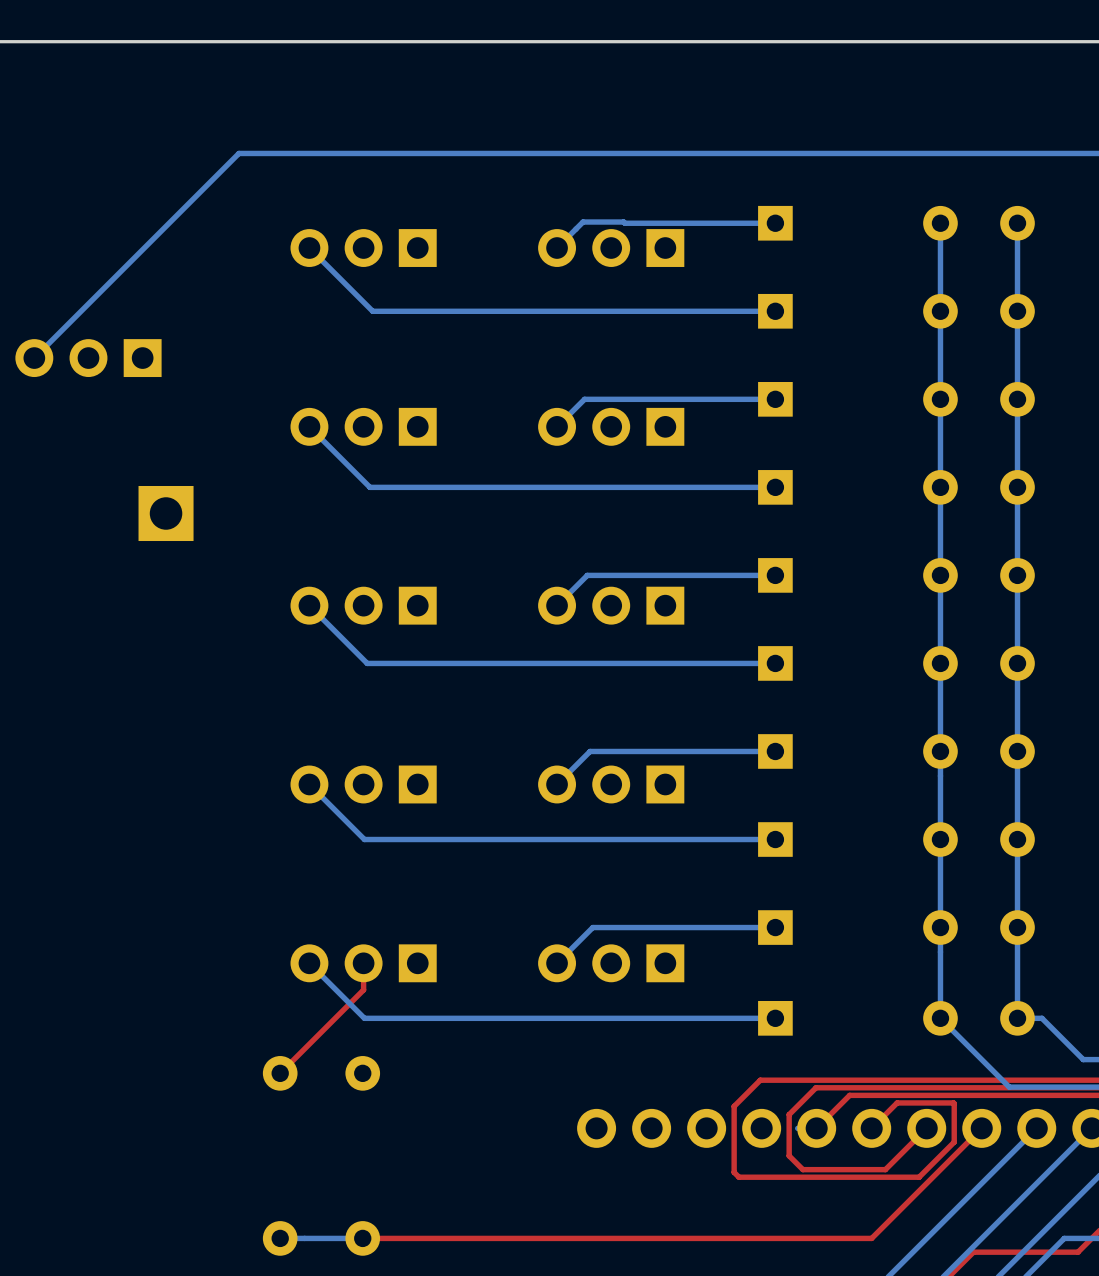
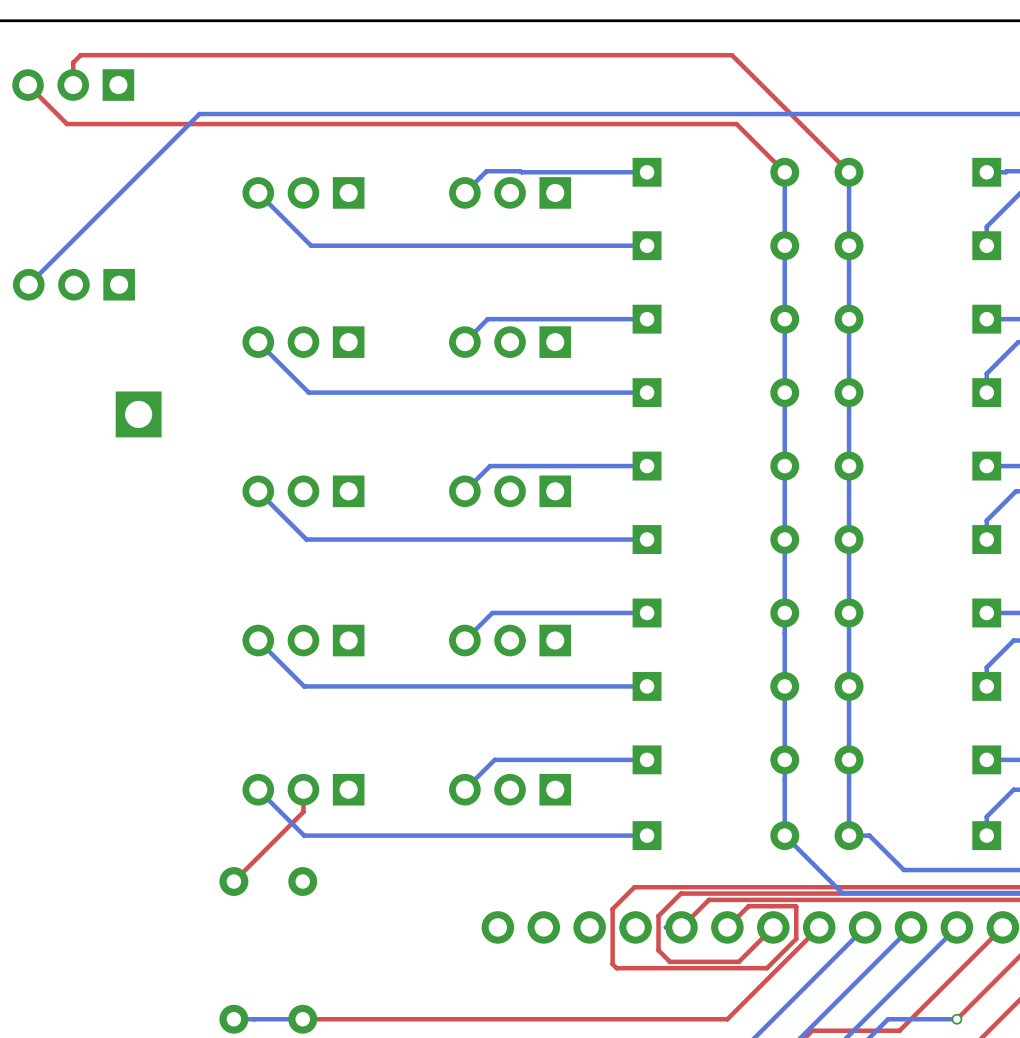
top track: none -> (28, 85) (67, 124) (736, 124) (784, 172)
top track: none -> (73, 85) (73, 62) (80, 55) (731, 55) (849, 172)
part: none -> (73, 85)

